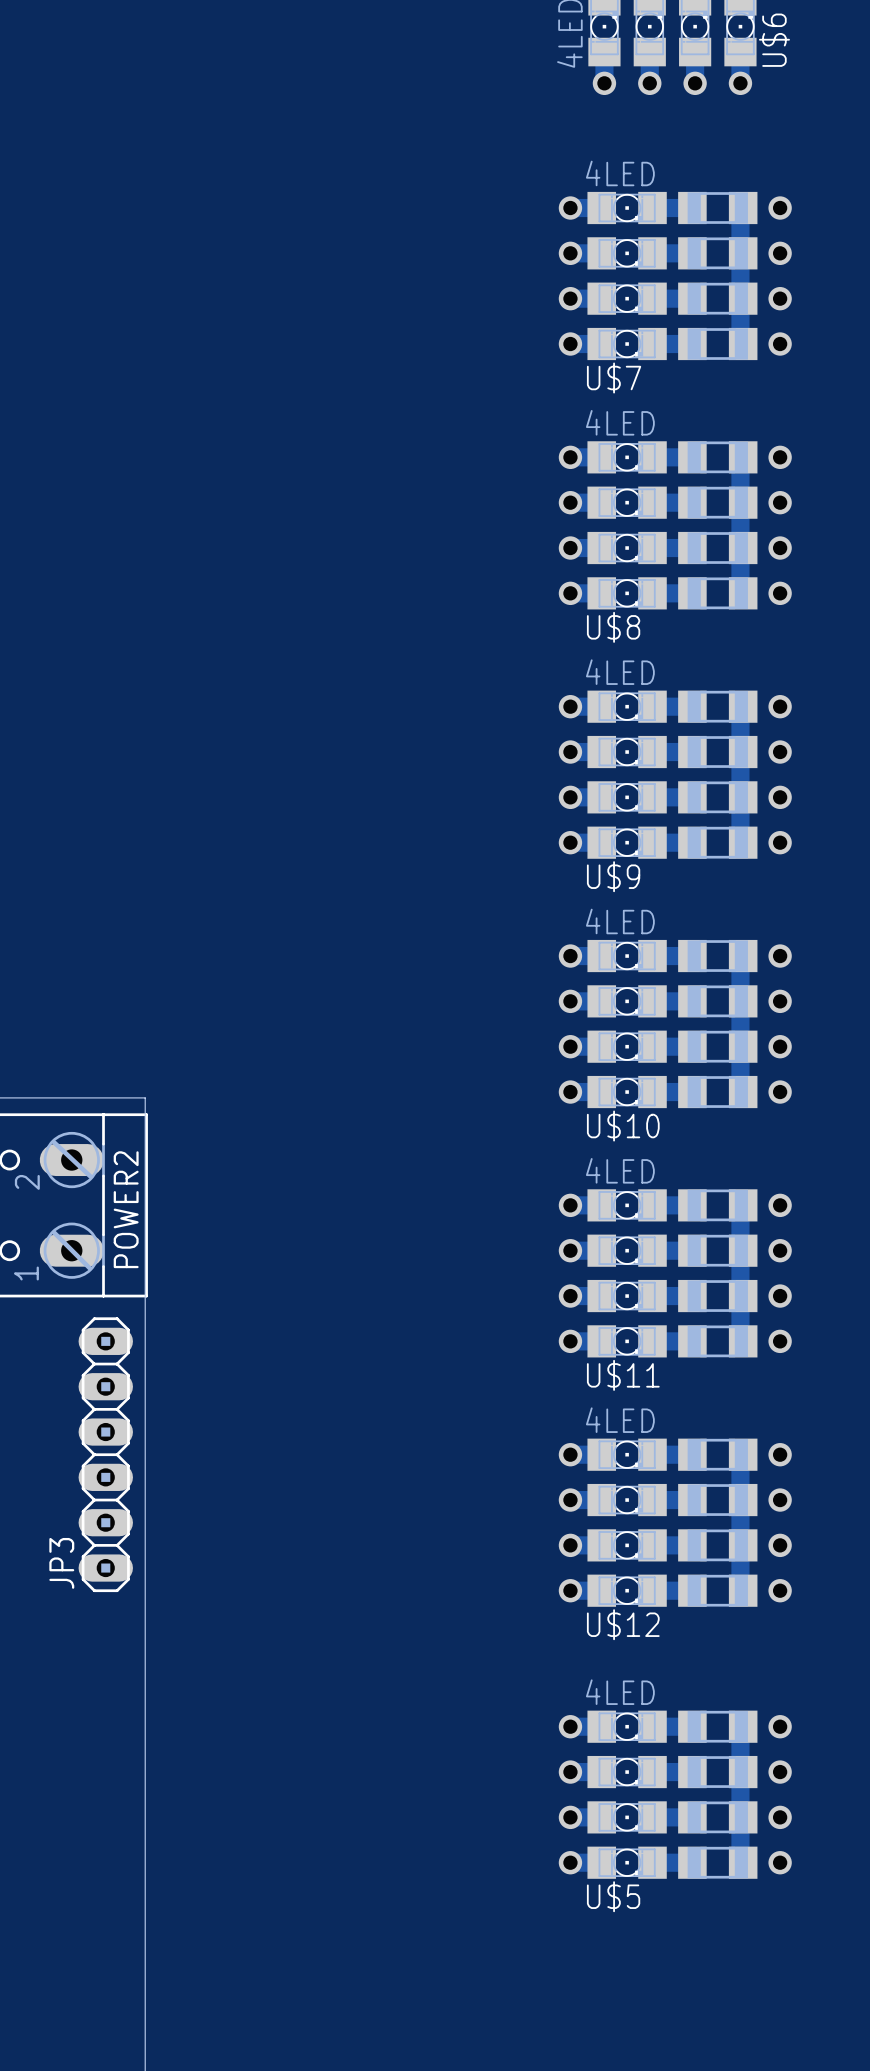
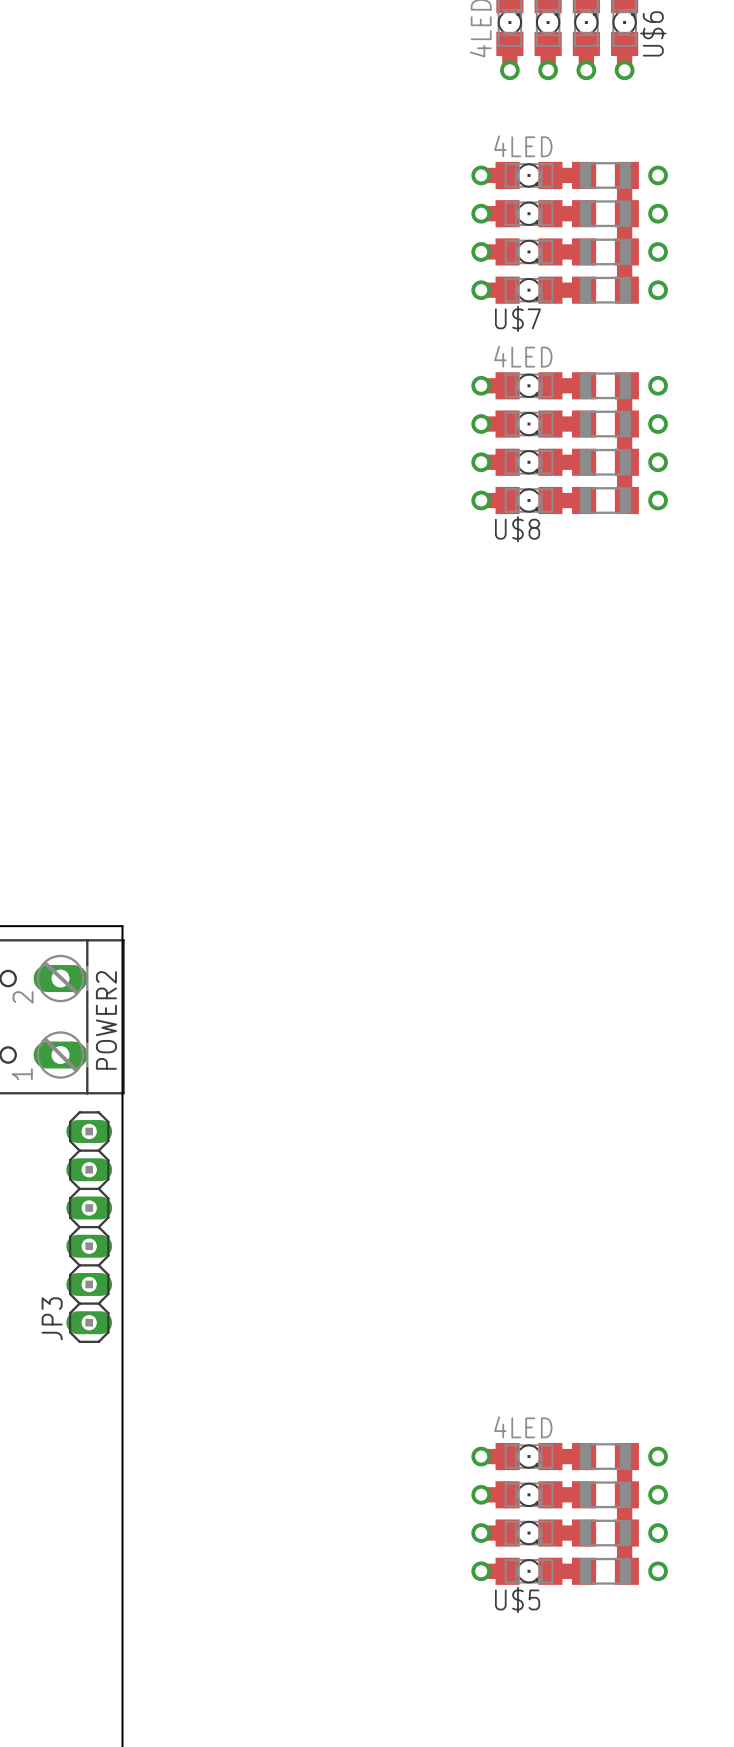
U$9: 4LED (675, 774) -> none
U$10: 4LED (675, 1024) -> none
U$11: 4LED (675, 1273) -> none
U$12: 4LED (675, 1522) -> none

